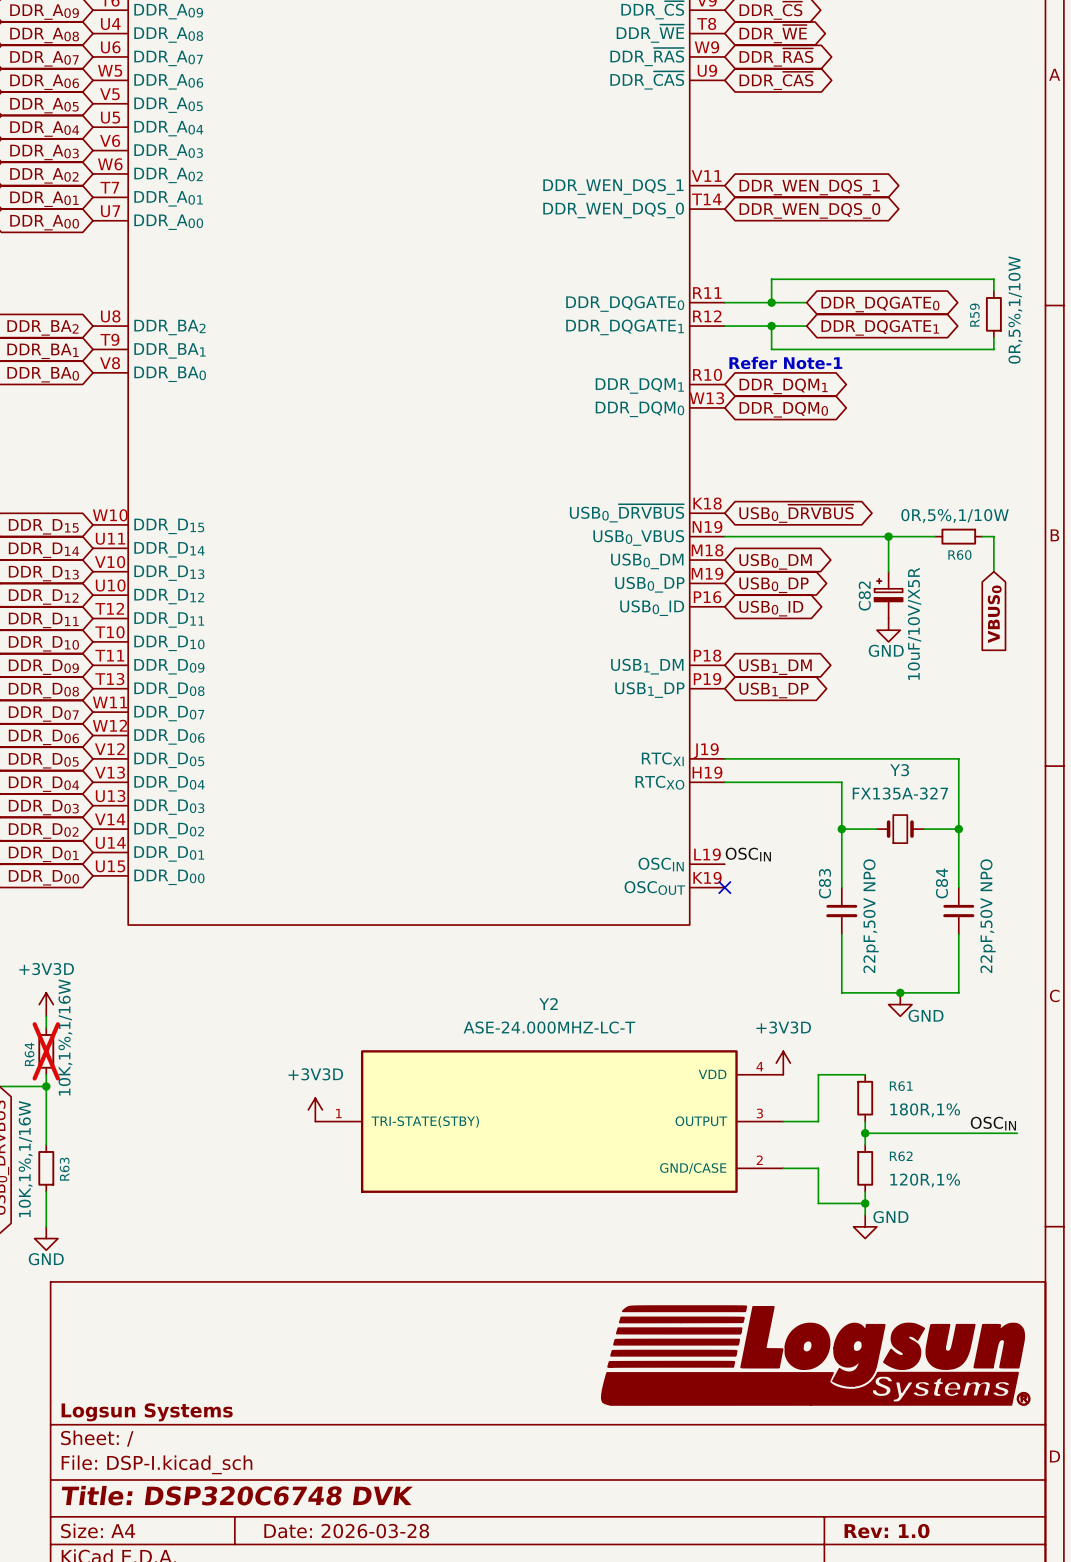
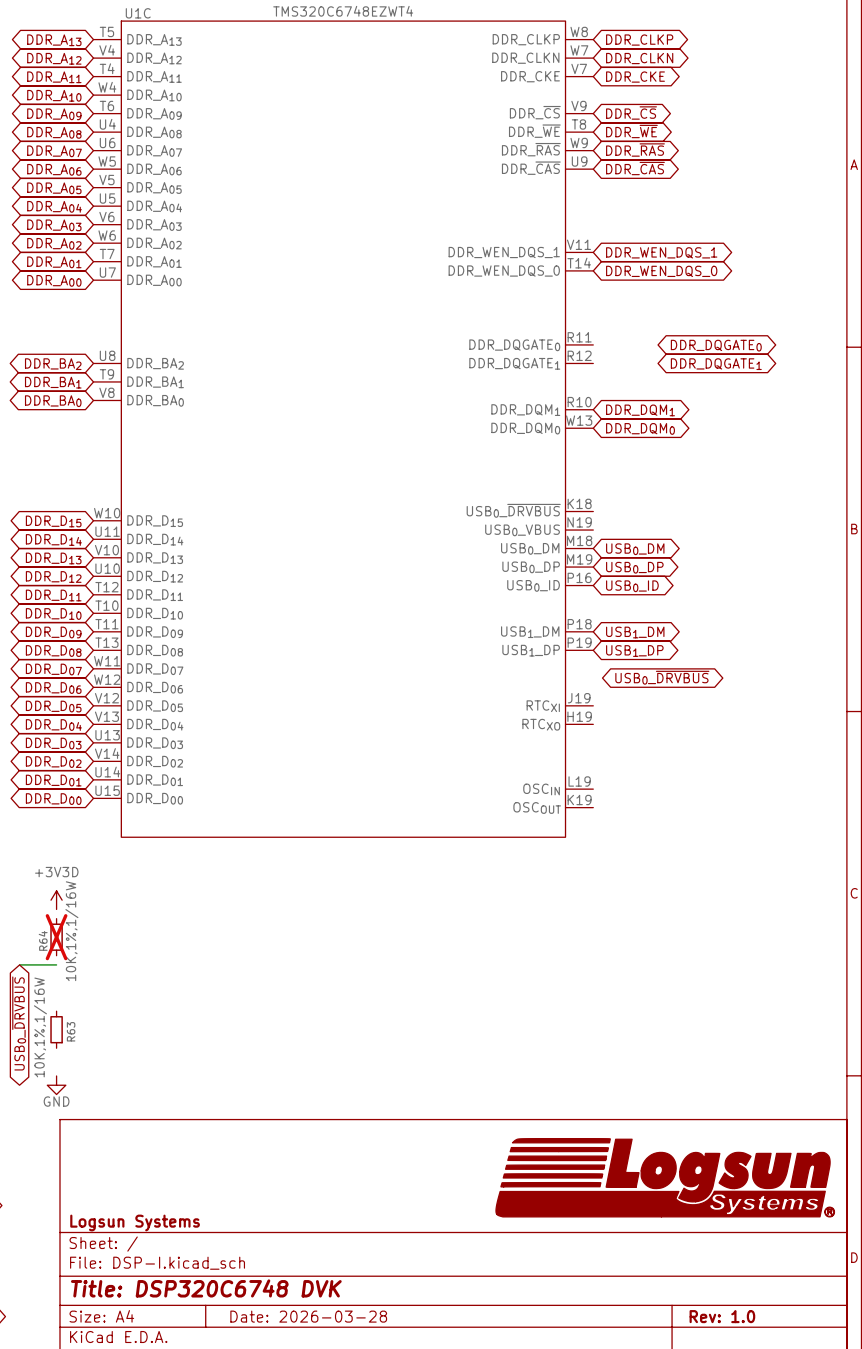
wire: (993, 290) (993, 279) (771, 279) (771, 302) -> none
wire: (724, 302) (806, 302) -> none
junction: (771, 302) -> none
R59: 0R,5%,1/10W (993, 314) -> none
wire: (724, 326) (806, 326) -> none
wire: (771, 326) (771, 349) (993, 349) (993, 337) -> none
junction: (771, 326) -> none
text: Refer Note-1 (785, 362) -> none
global label position: USB0_~{DRVBUS} (796, 513) -> USB0_~{DRVBUS} (662, 677)
wire: (724, 536) (935, 536) -> none
wire: (888, 536) (888, 571) -> none
junction: (888, 536) -> none
R60: 0R,5%,1/10W (958, 536) -> none
wire: (982, 536) (993, 536) (993, 571) -> none
C82: 10uF/10V/X5R (888, 595) -> none
global label: VBUS0 (994, 614) -> none
power symbol: GND (888, 630) -> none
wire: (724, 758) (958, 758) (958, 887) -> none
wire: (724, 782) (841, 782) (841, 887) -> none
wire: (841, 829) (876, 829) -> none
junction: (841, 829) -> none
Y3: FX135A-327 (900, 829) -> none
wire: (923, 829) (958, 829) -> none
junction: (958, 829) -> none
label: OSCIN (748, 854) -> none
no-connect mark: (724, 887) -> none
C83: 22pF,50V NPO (841, 910) -> none
C84: 22pF,50V NPO (958, 910) -> none
wire: (841, 934) (841, 992) (958, 992) (958, 934) -> none
junction: (900, 992) -> none
power symbol: GND (900, 1004) -> none
wire: (46, 1016) (46, 1027) -> none
power symbol: +3V3D (783, 1063) -> none
wire: (46, 1074) (46, 1144) -> none
wire: (865, 1074) (818, 1074) (818, 1121) (783, 1121) -> none
junction: (46, 1086) -> none
R61: 180R,1% (865, 1098) -> none
power symbol: +3V3D (315, 1109) -> none
Y2: ASE-24.000MHZ-LC-T (549, 1121) -> none
wire: (865, 1121) (865, 1144) -> none
label: OSCIN (993, 1123) -> none
wire: (865, 1133) (1017, 1133) -> none
junction: (865, 1133) -> none
wire: (783, 1168) (818, 1168) (818, 1203) (865, 1203) -> none
R62: 120R,1% (865, 1168) -> none
wire: (46, 1191) (46, 1226) -> none
wire: (865, 1191) (865, 1215) -> none
junction: (865, 1203) -> none
power symbol: GND (865, 1226) -> none

